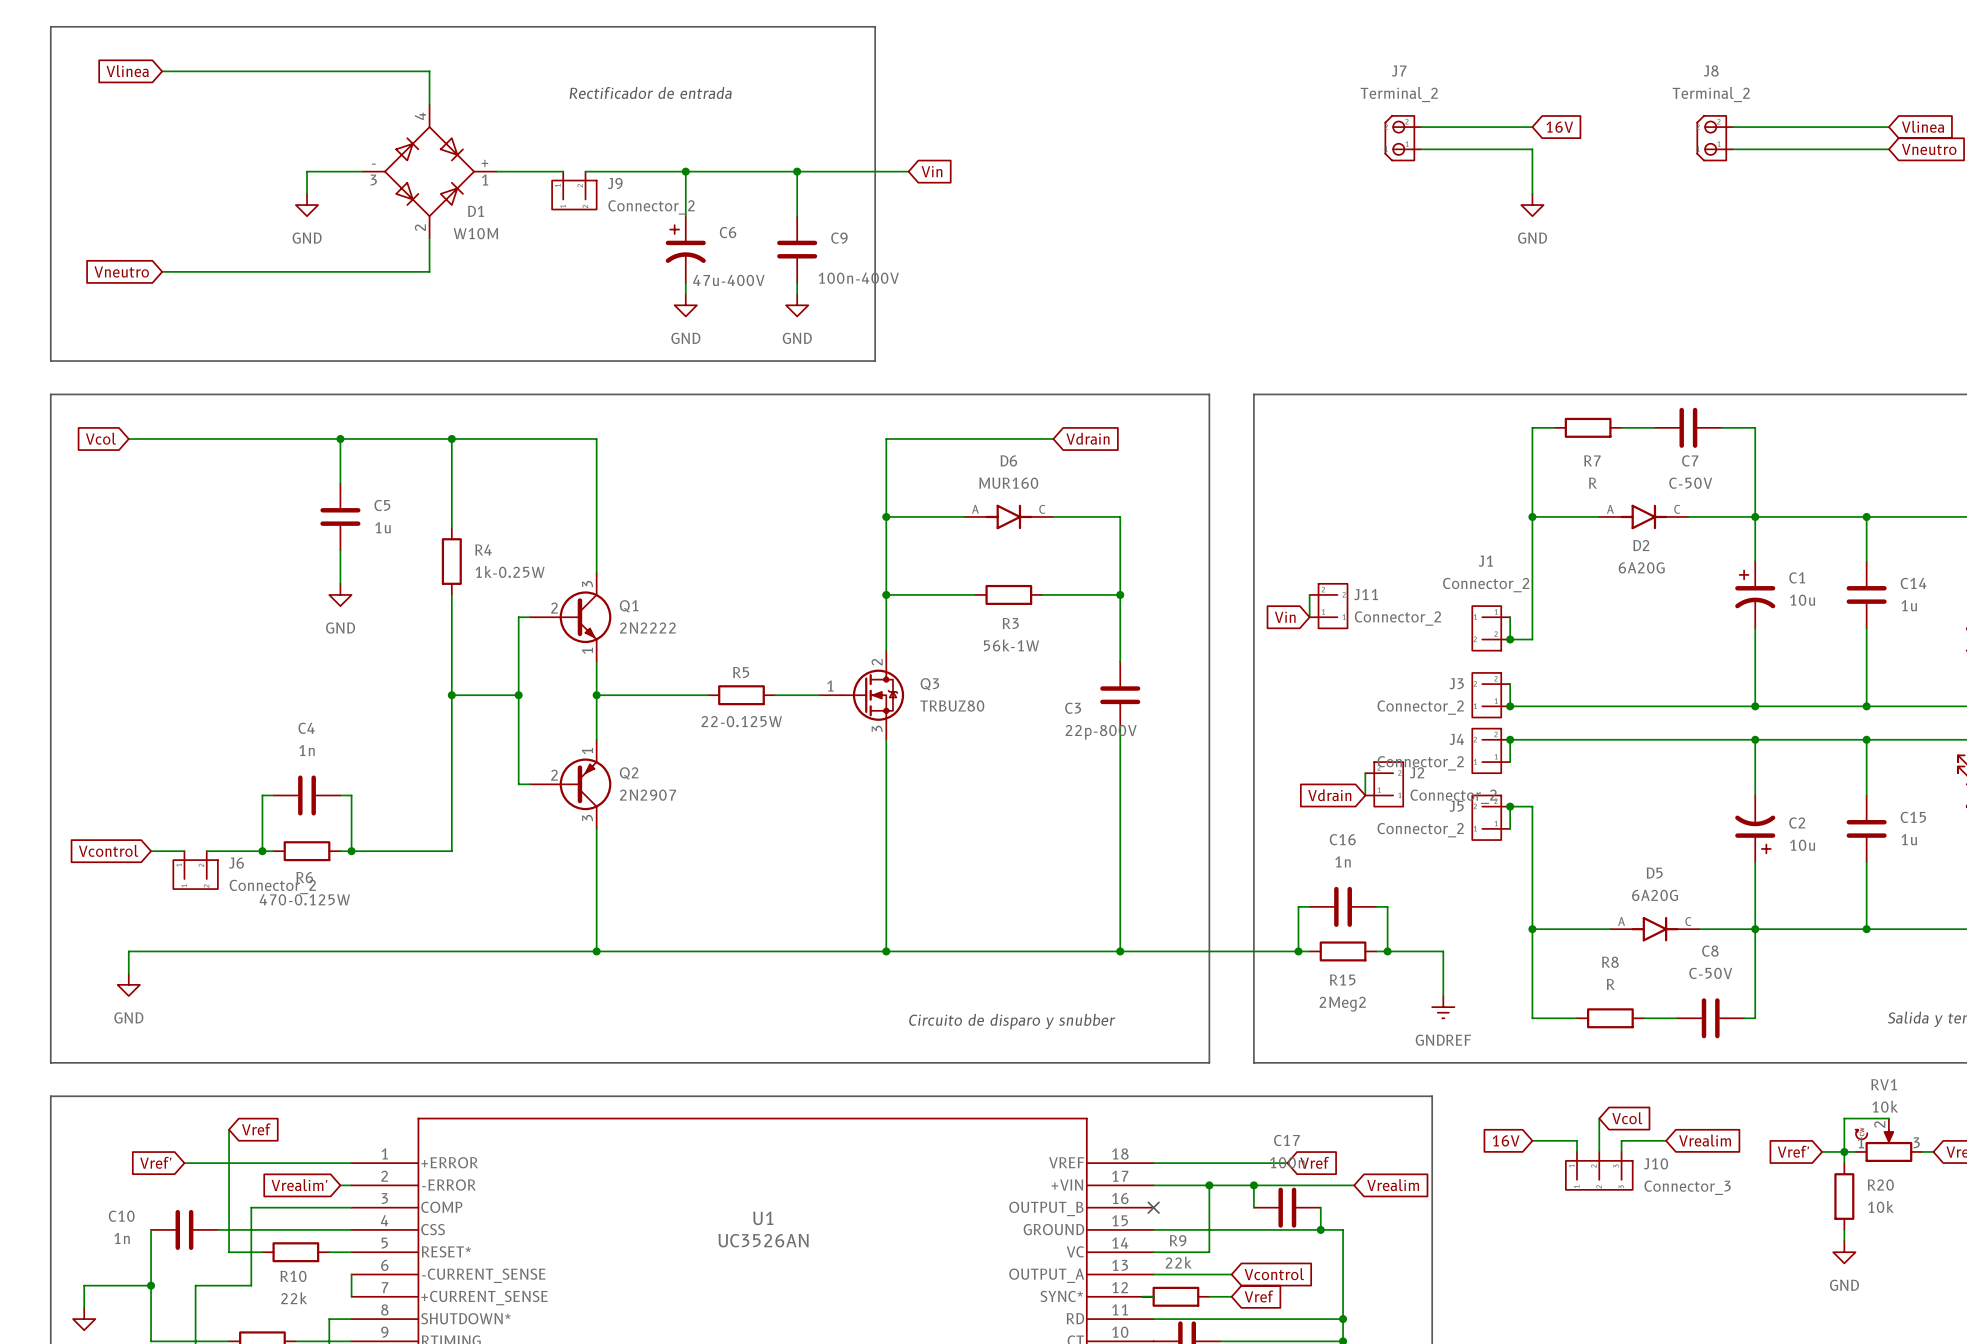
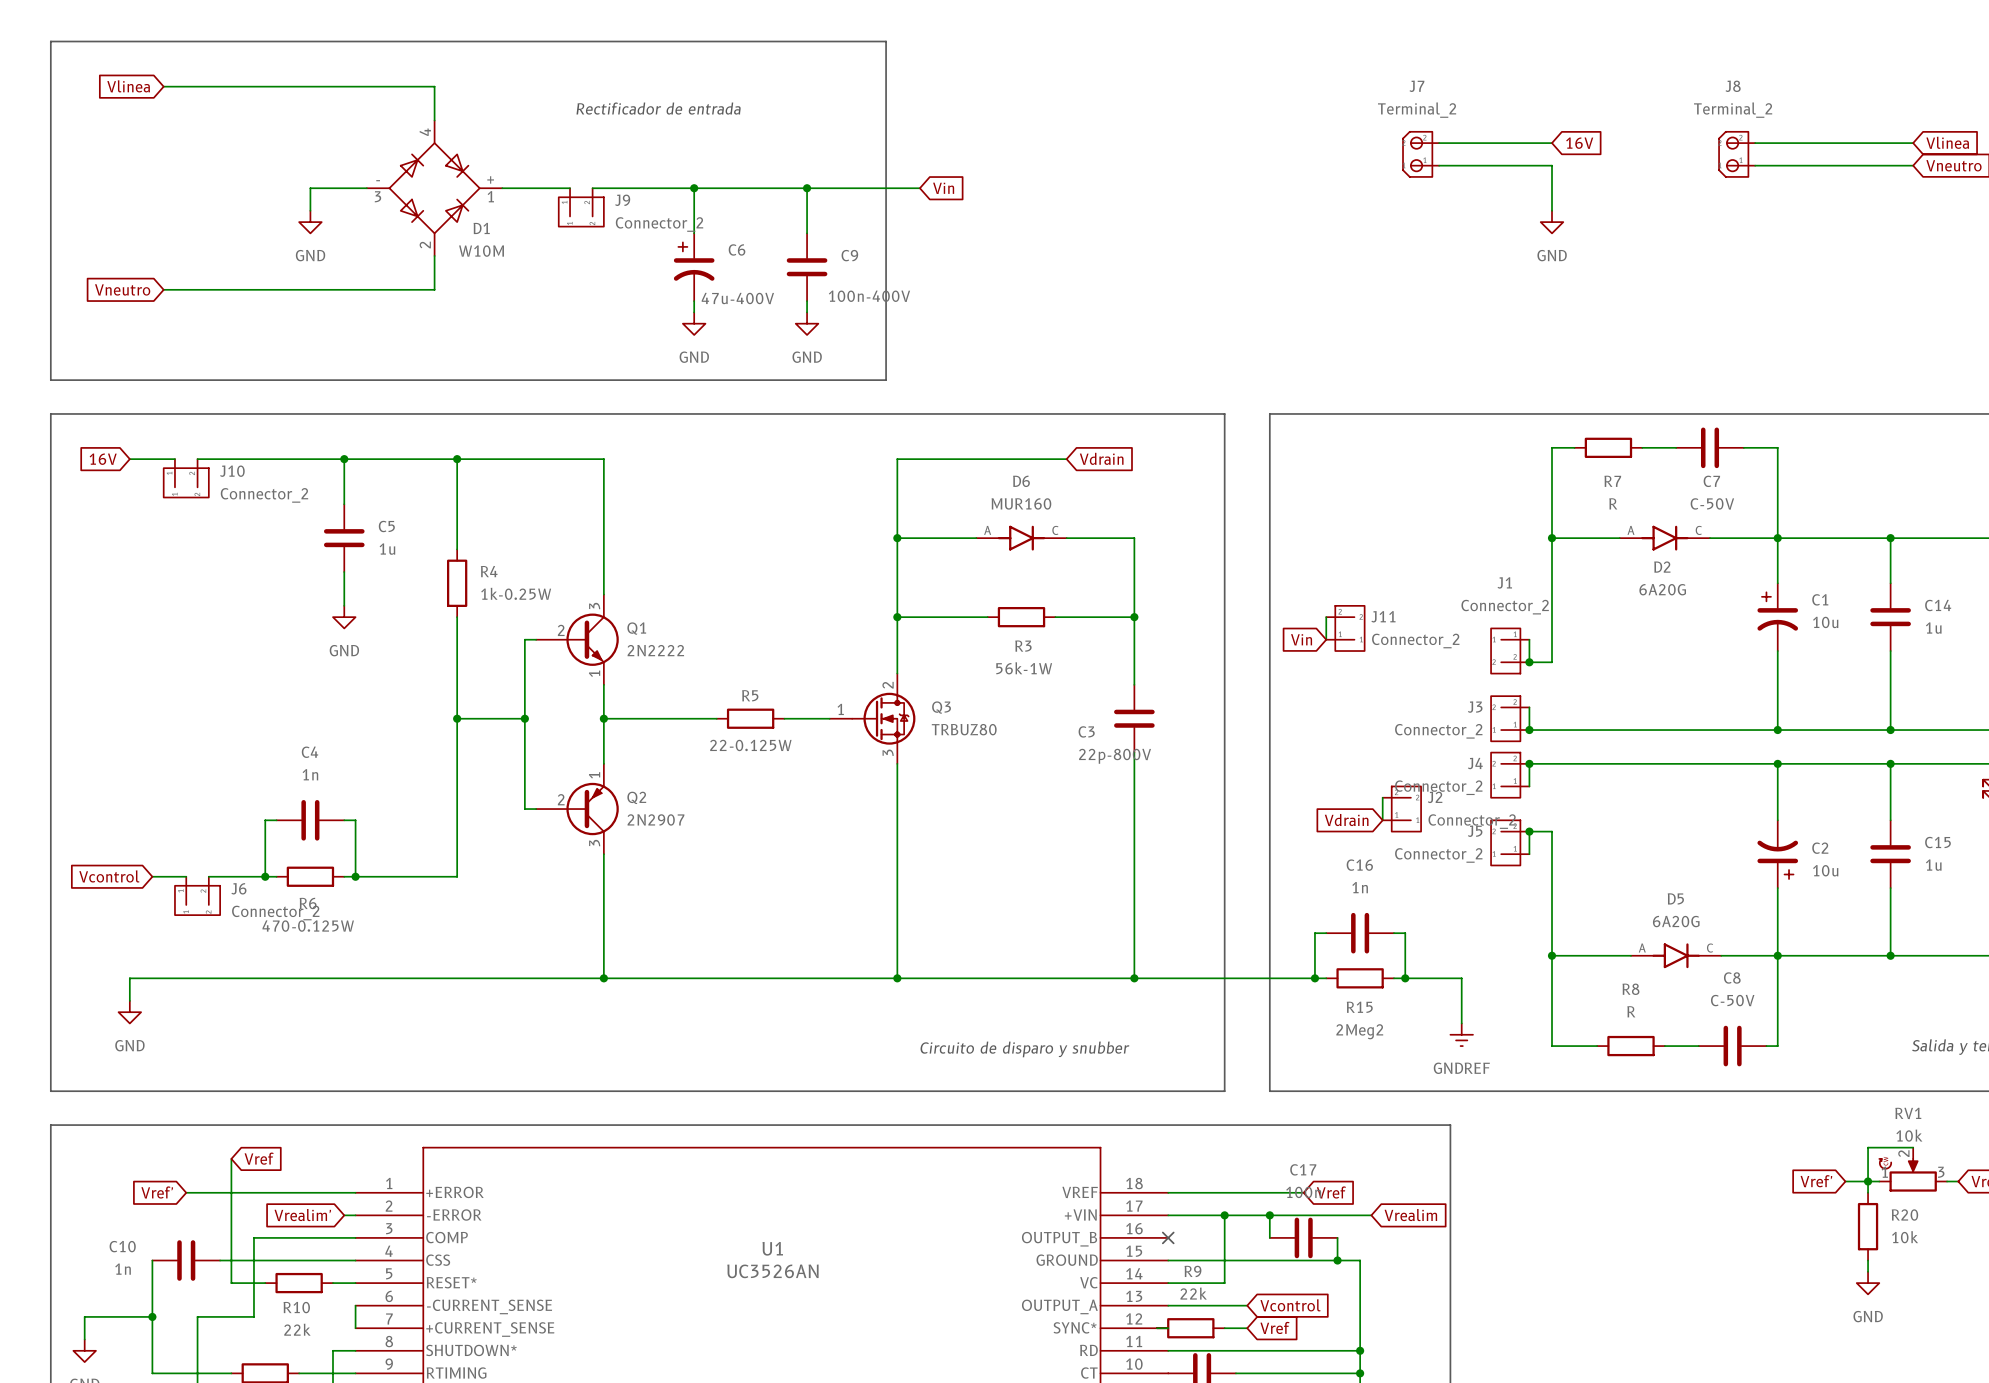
global label: Vcol (100, 438) -> 16V (103, 459)
wire: (173, 438) (195, 438) -> none
wire: (1599, 1118) (1599, 1151) -> none
global label: Vcol (1627, 1118) -> none
global label: 16V (1506, 1140) -> none
wire: (1532, 1140) (1576, 1140) (1576, 1151) -> none
wire: (1666, 1140) (1621, 1140) (1621, 1151) -> none
global label: Vrealim (1705, 1140) -> none
J10 symbol: [1565, 1151, 1633, 1190] -> [163, 459, 209, 498]
J10 value: Connector_3 (1687, 1187) -> Connector_2 (264, 495)

